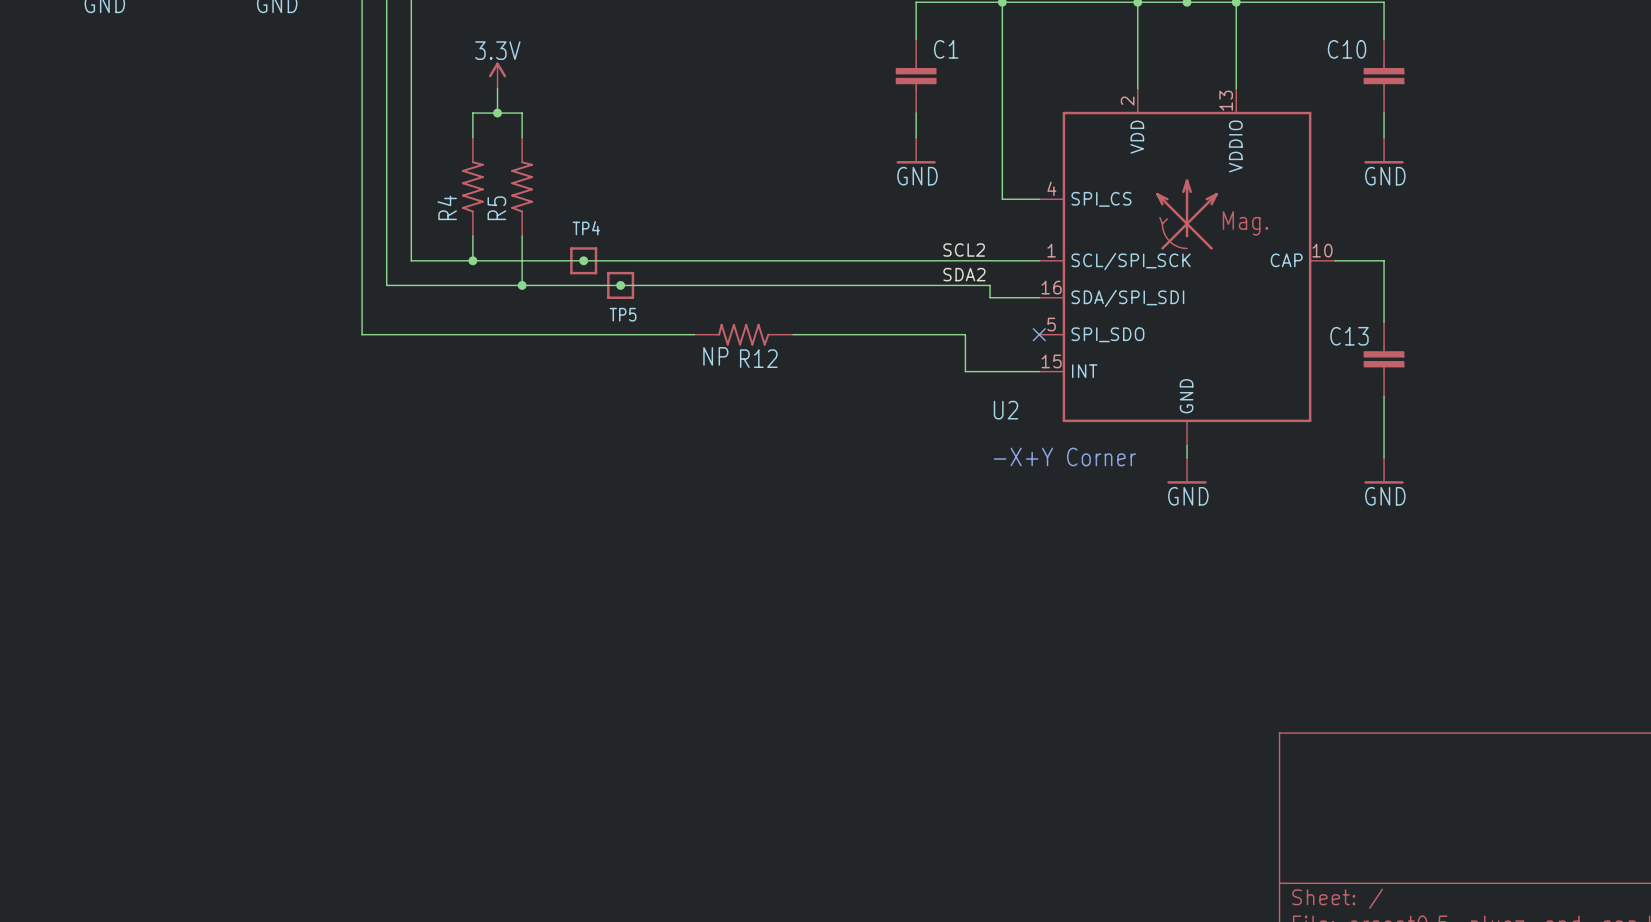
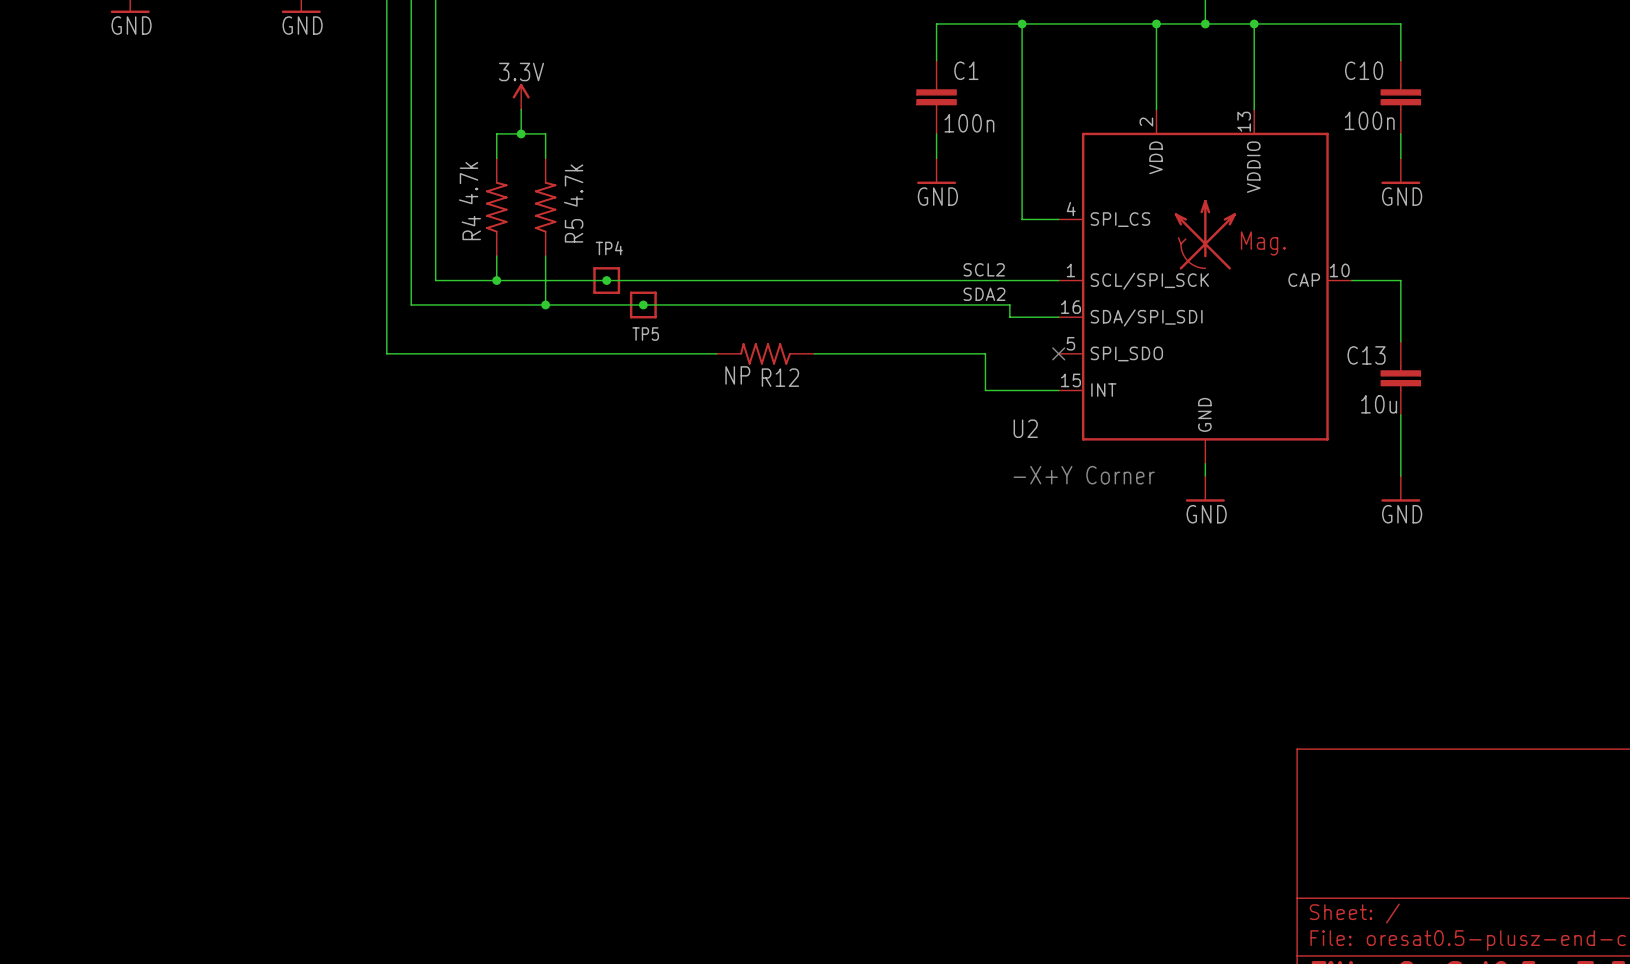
C10 value: none -> 100n (1369, 120)
C1 value: none -> 100n (969, 123)
R4 value: none -> 4.7k (468, 183)
R5 value: none -> 4.7k (573, 185)
R5 name position: R5 (496, 208) -> R5 (574, 230)
C13 value: none -> 10u (1379, 404)

